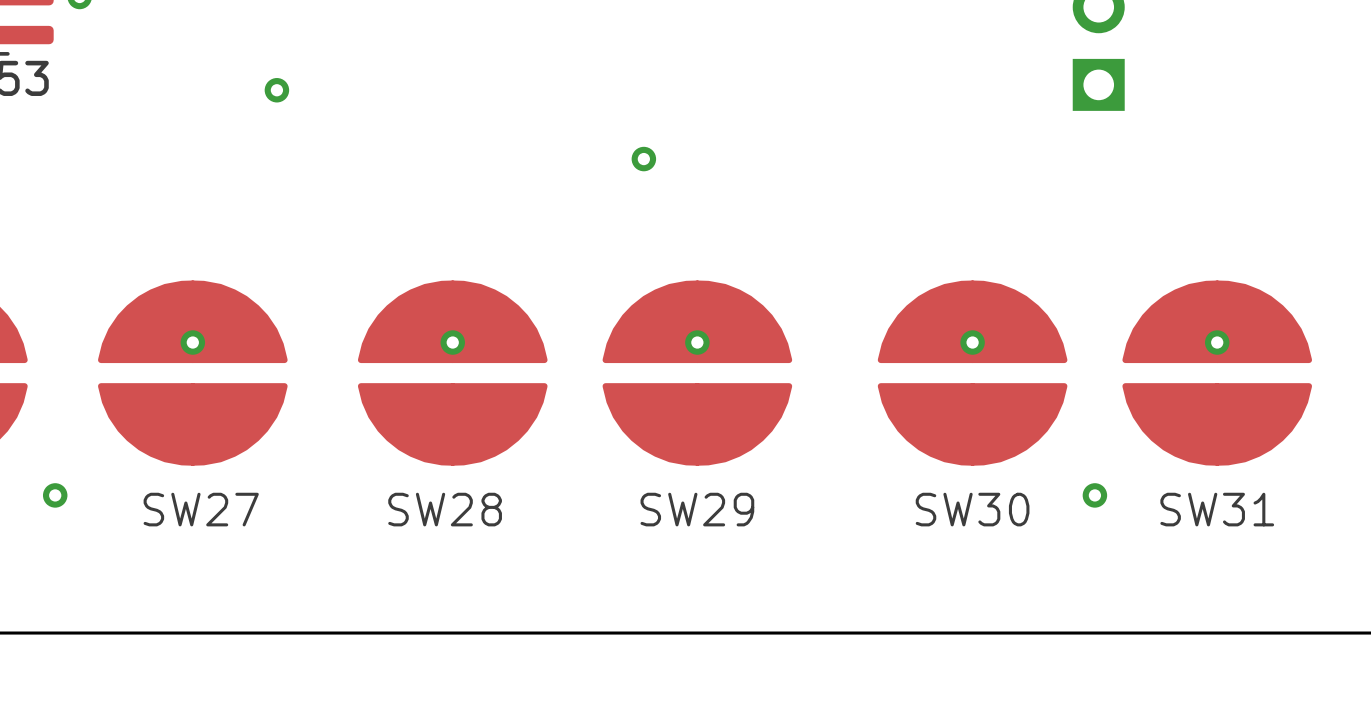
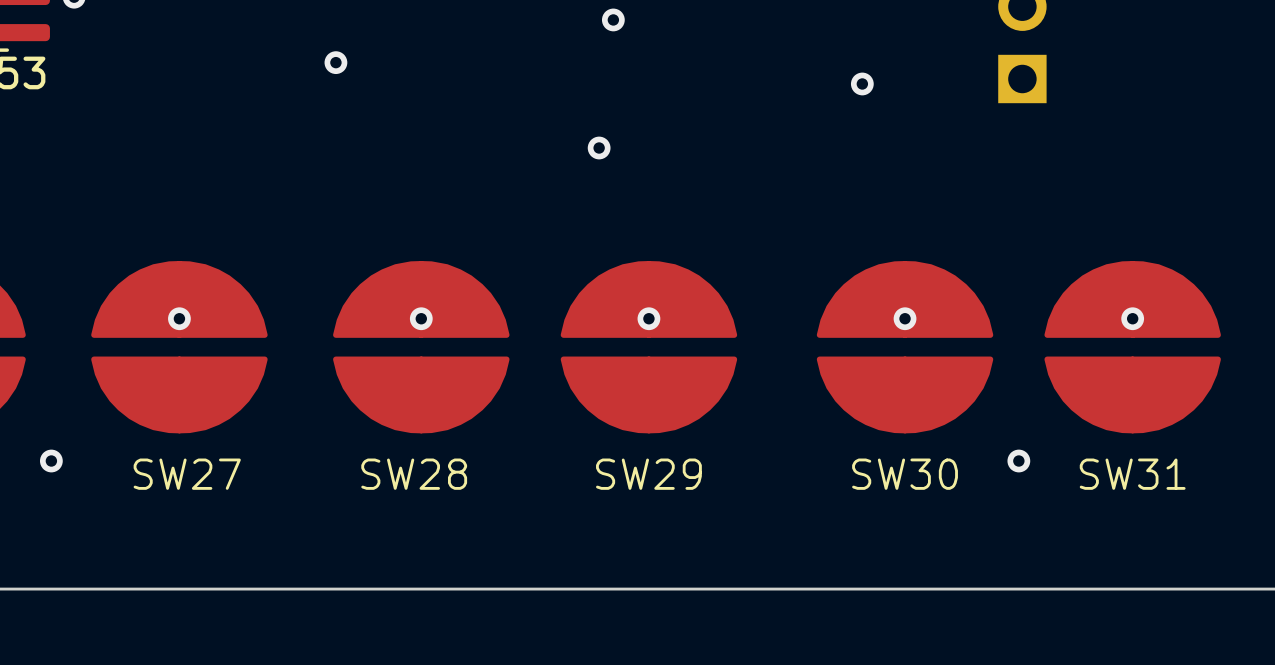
via: none -> (613, 19)
via position: (276, 90) -> (335, 62)
via: none -> (862, 83)

